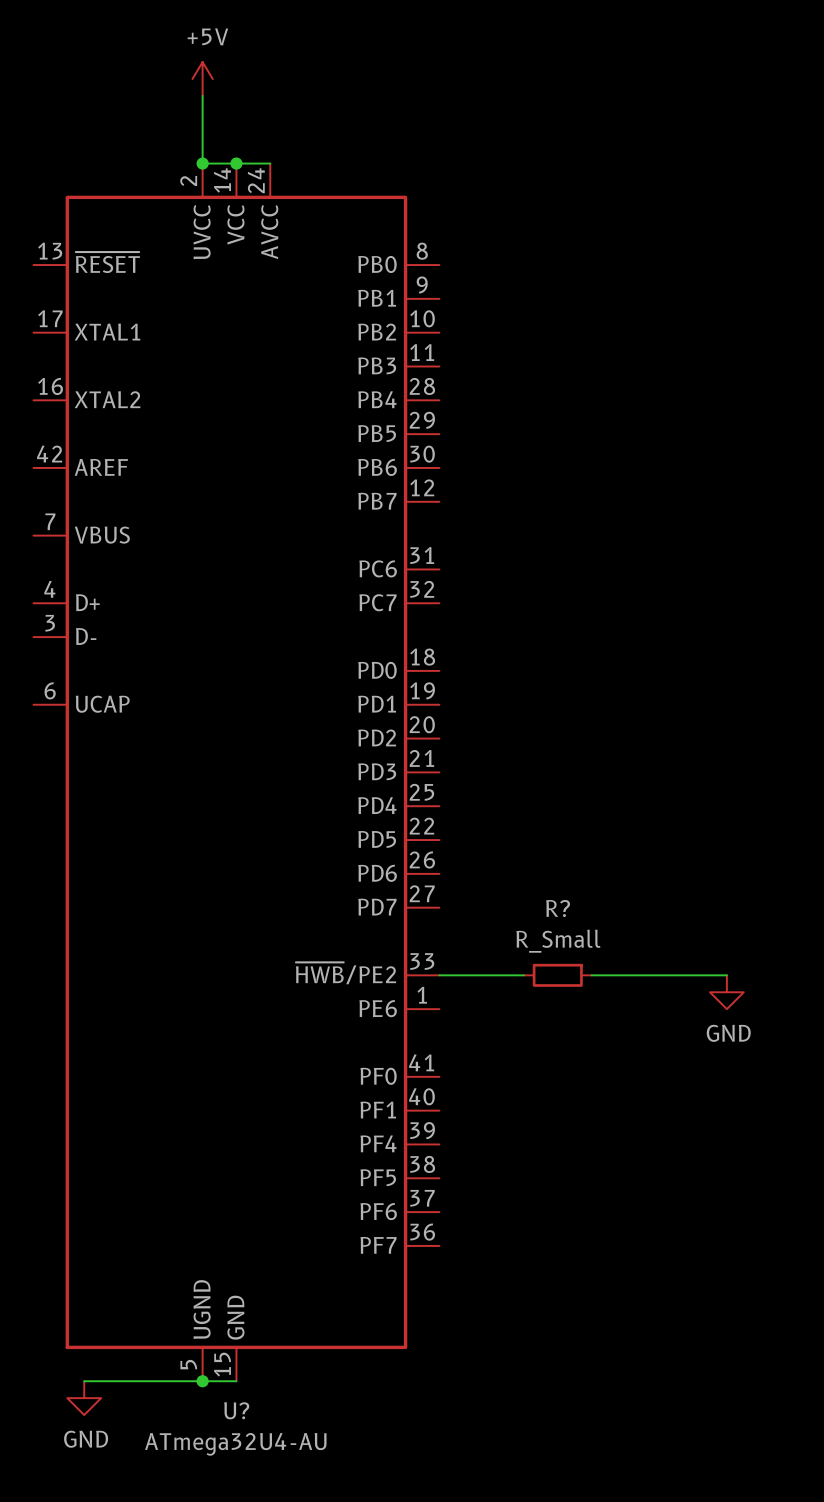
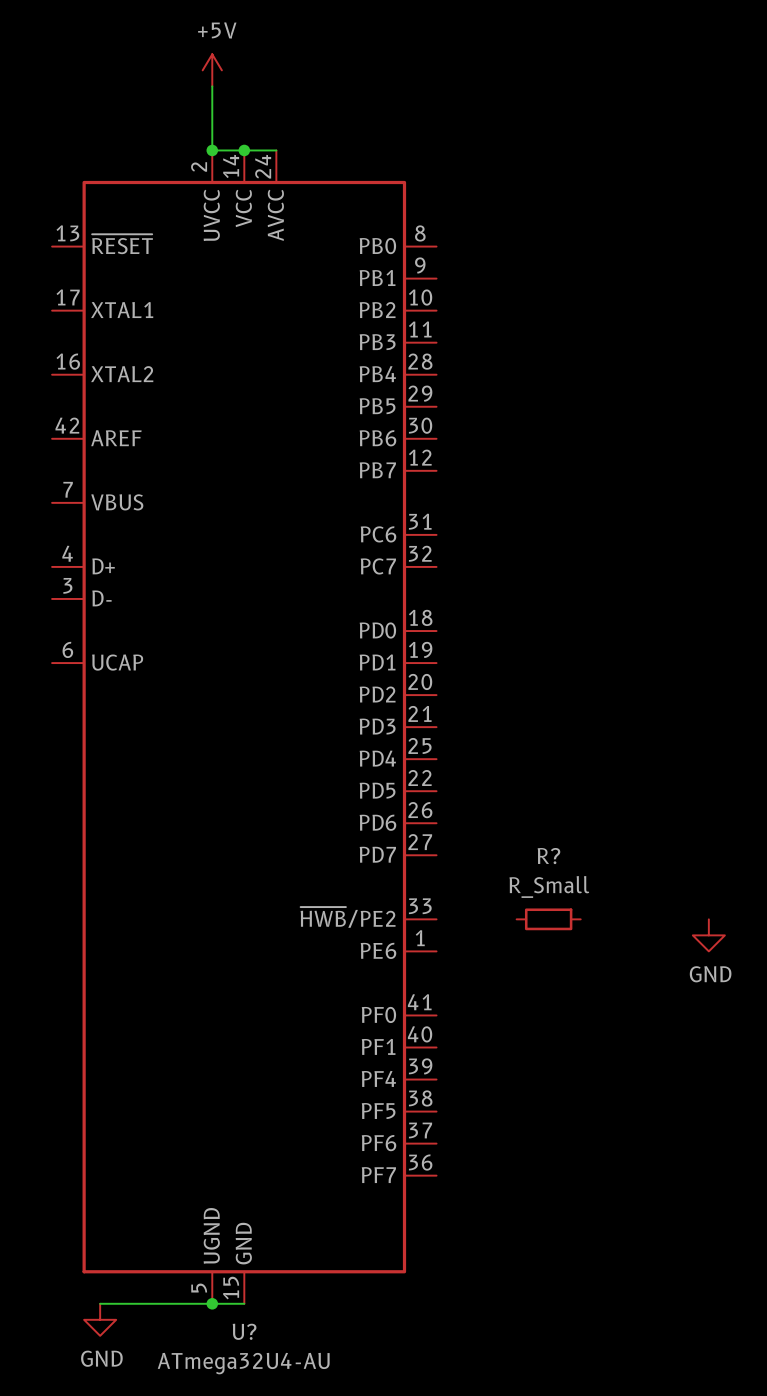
wire: (439, 975) (523, 975) -> none
wire: (591, 975) (726, 975) -> none

